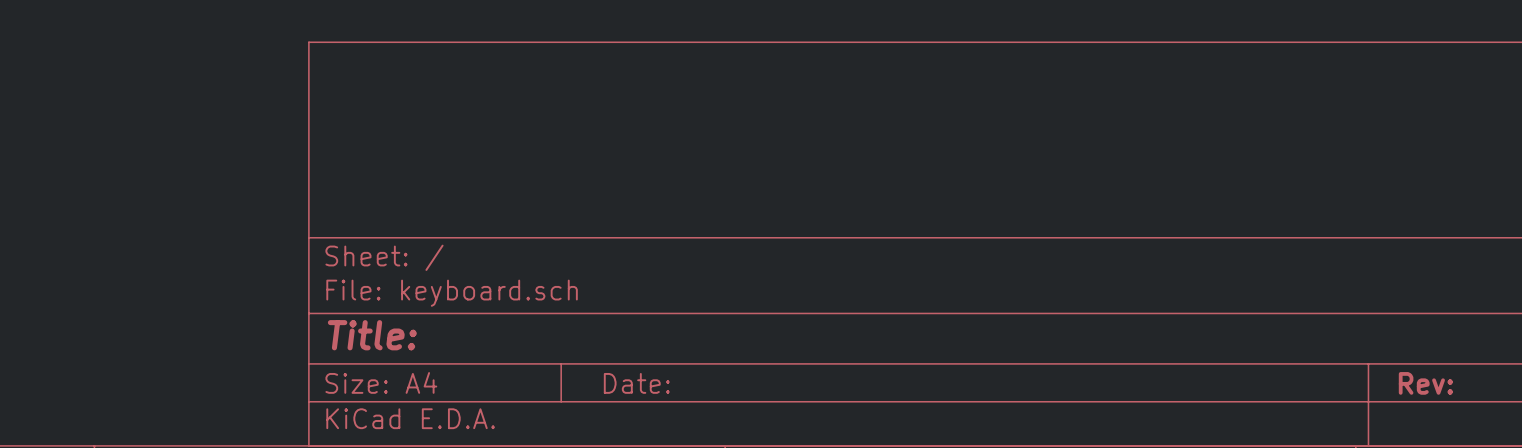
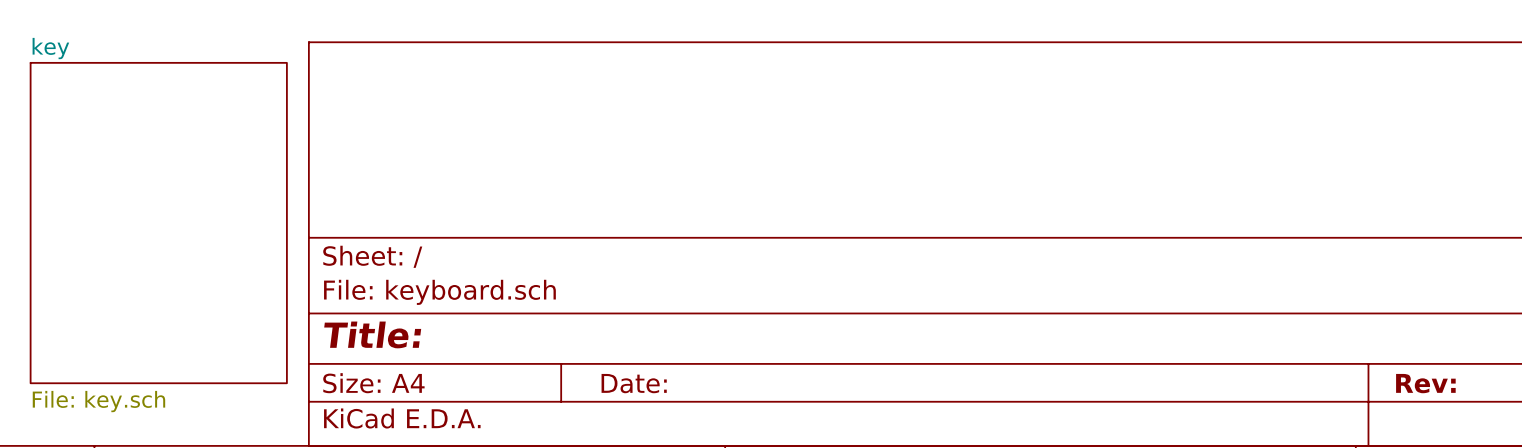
sheet key: none -> File: key.sch (158, 223)

